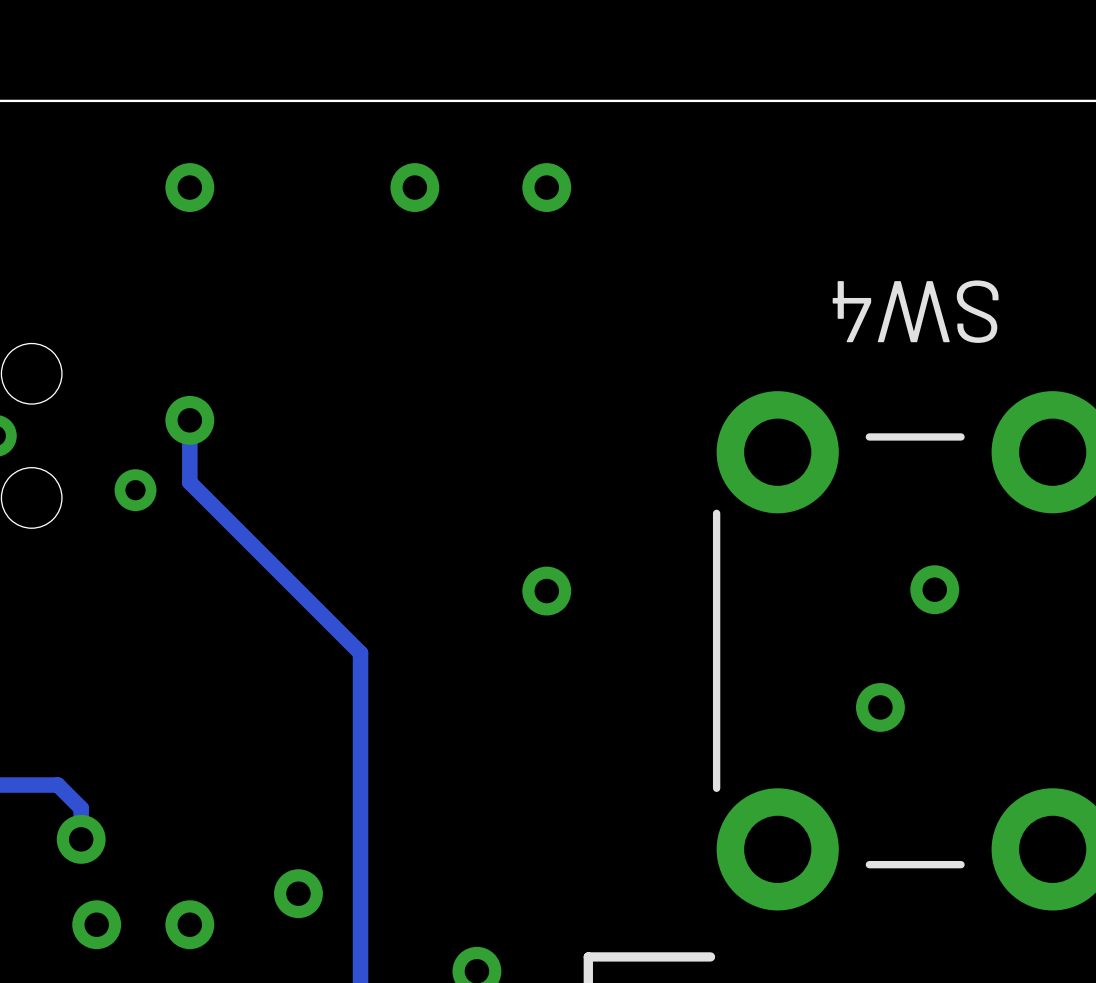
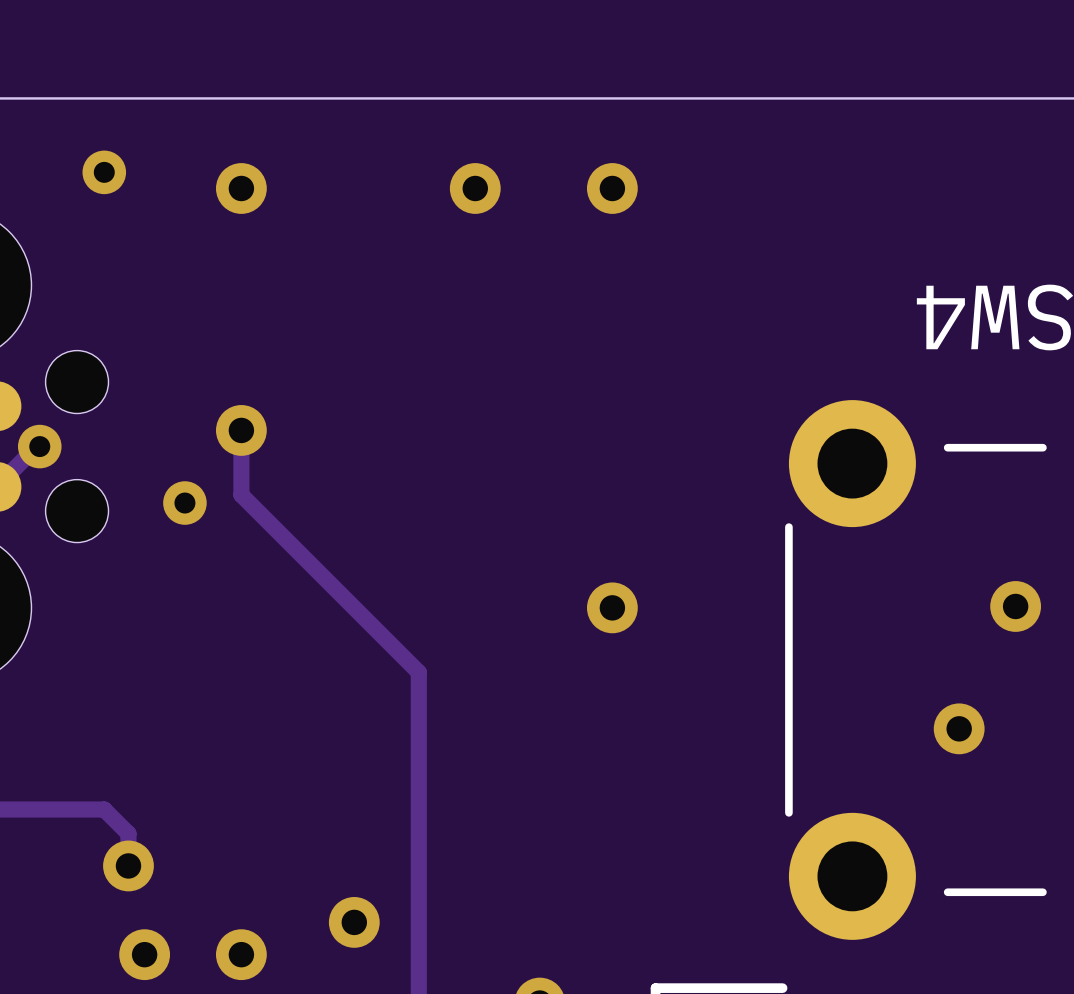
via: none -> (104, 172)

